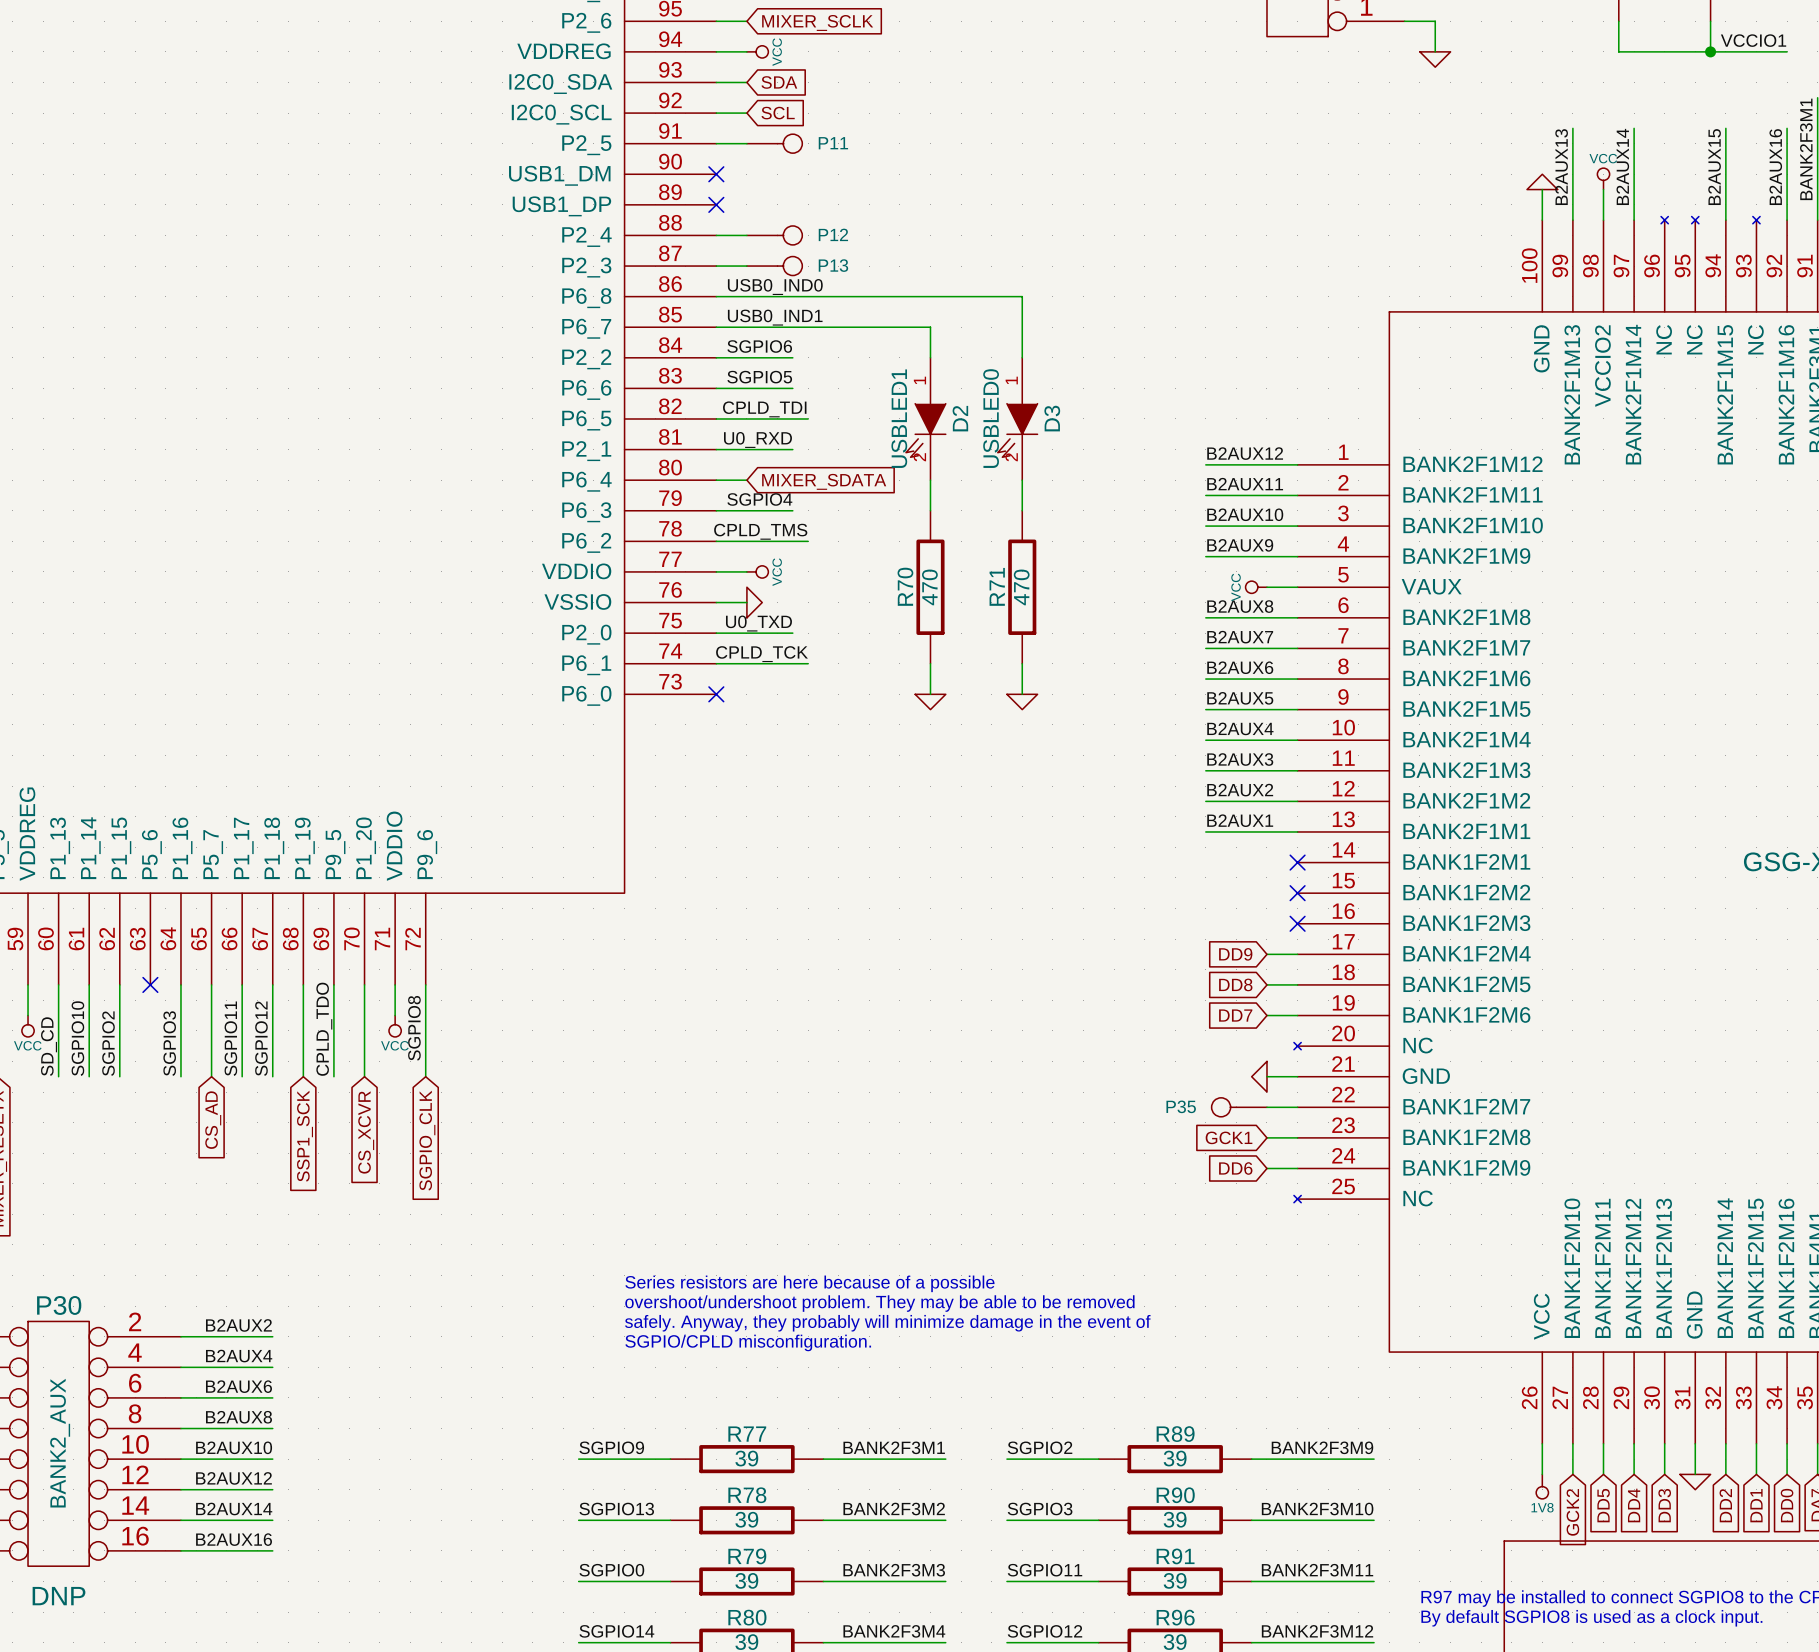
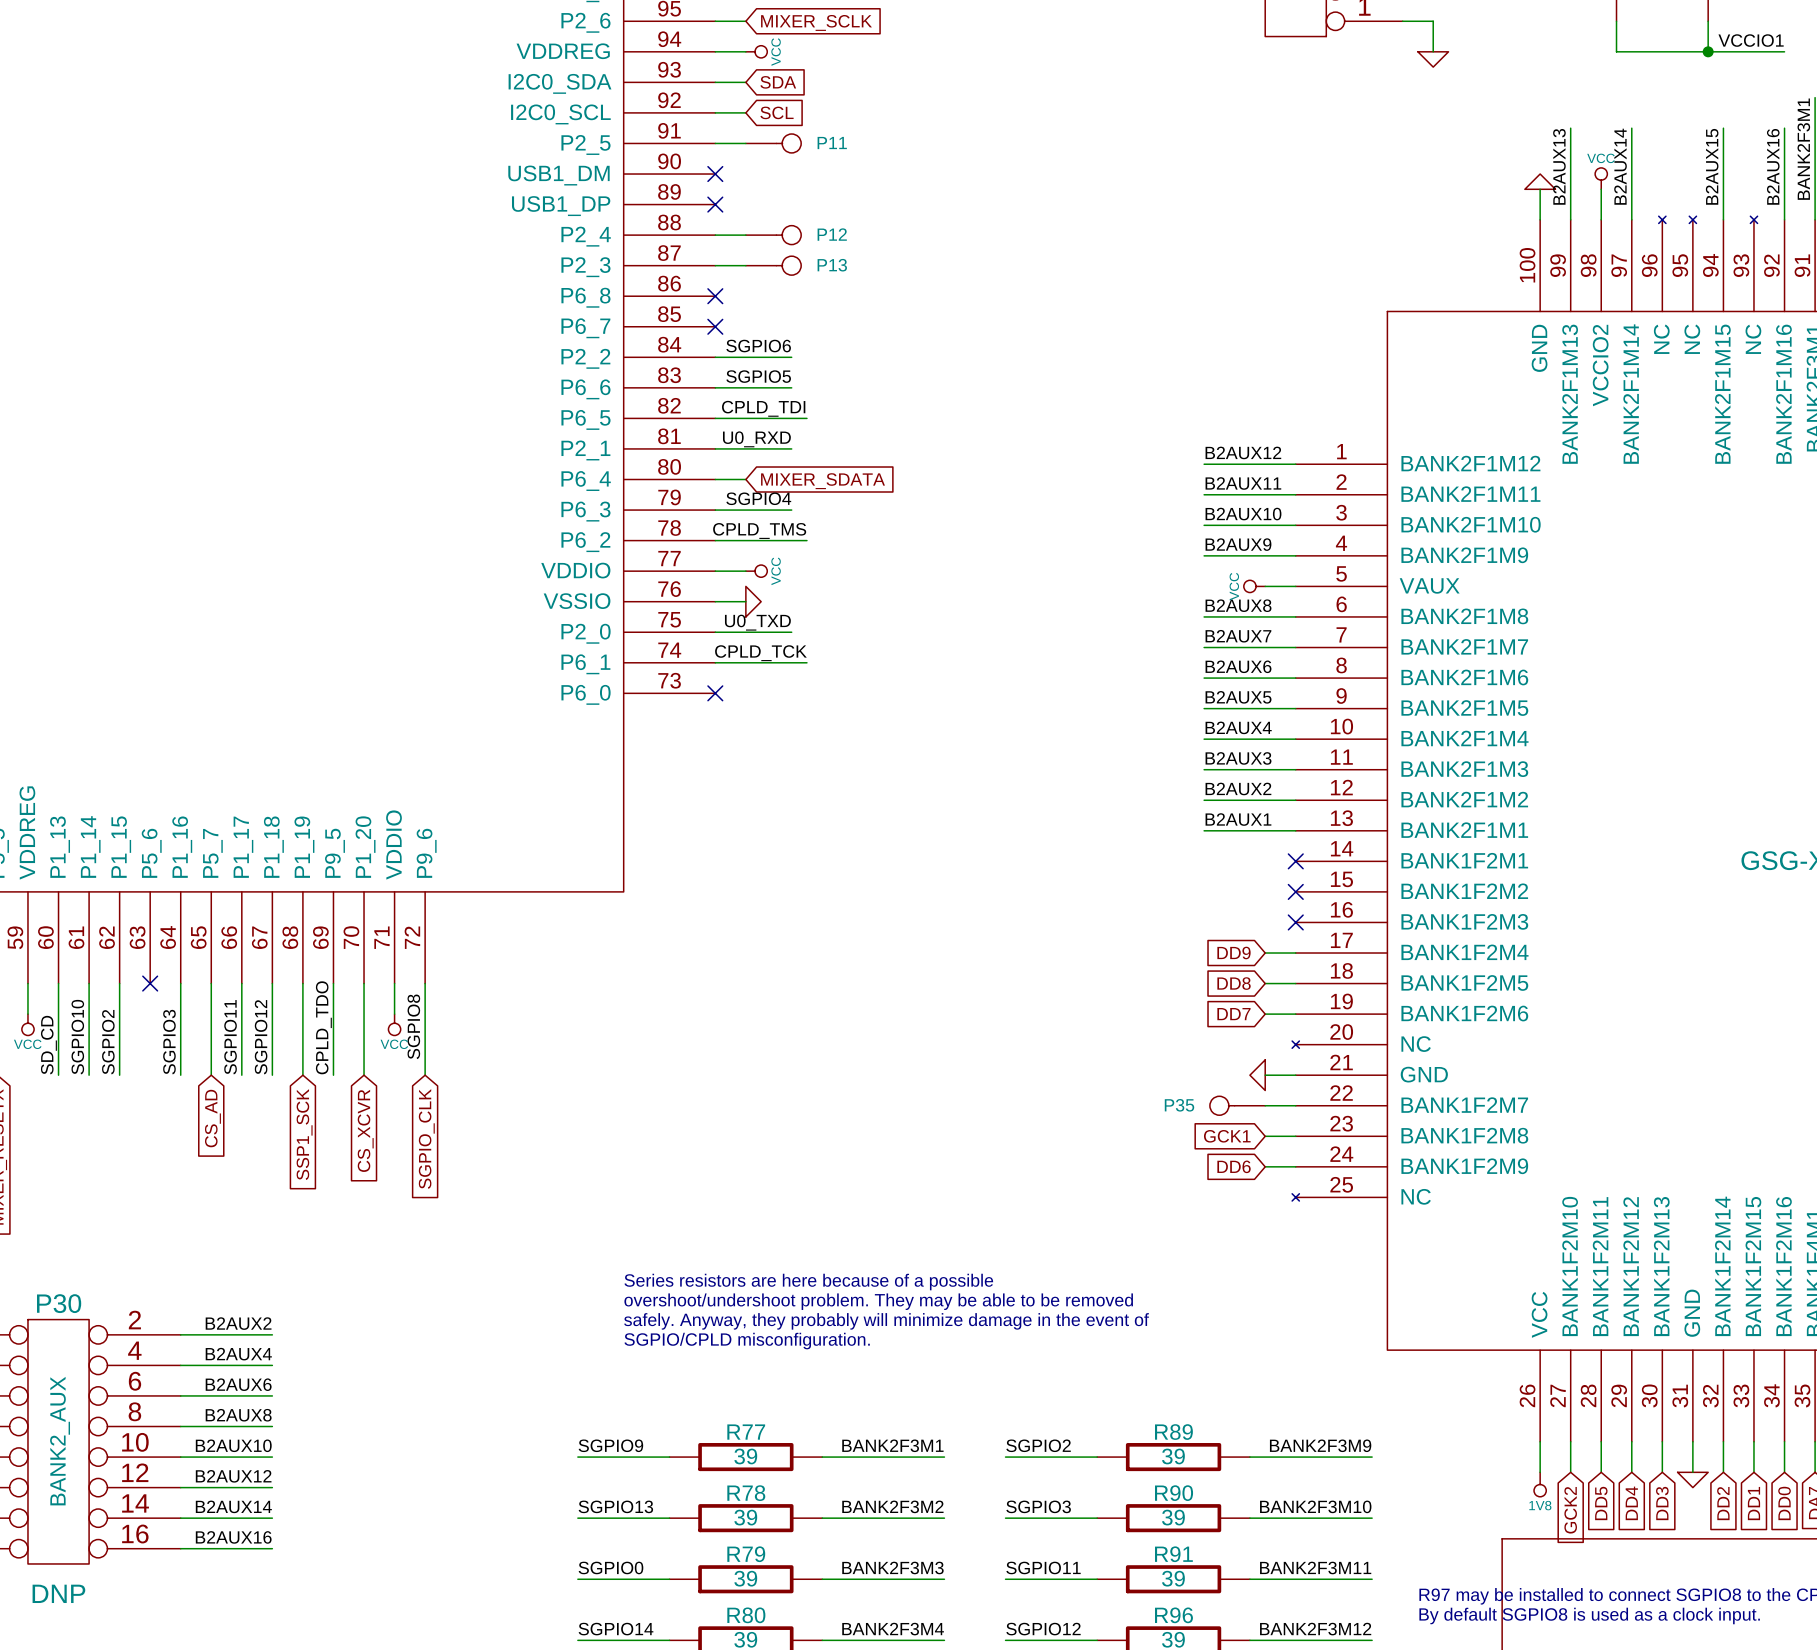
label: USB0_IND0 (775, 287) -> none
wire: (716, 296) (1022, 296) (1022, 357) -> none
no-connect mark: none -> (715, 296)
label: USB0_IND1 (775, 317) -> none
wire: (716, 327) (930, 327) (930, 357) -> none
no-connect mark: none -> (715, 326)
D2: USBLED1 (925, 418) -> none
D3: USBLED0 (1017, 418) -> none
wire: (930, 480) (930, 510) -> none
wire: (1022, 480) (1022, 510) -> none
R70: 470 (930, 587) -> none
R71: 470 (1022, 587) -> none
wire: (930, 663) (930, 694) -> none
wire: (1022, 663) (1022, 694) -> none
power symbol: (930, 701) -> none
power symbol: (1022, 701) -> none

